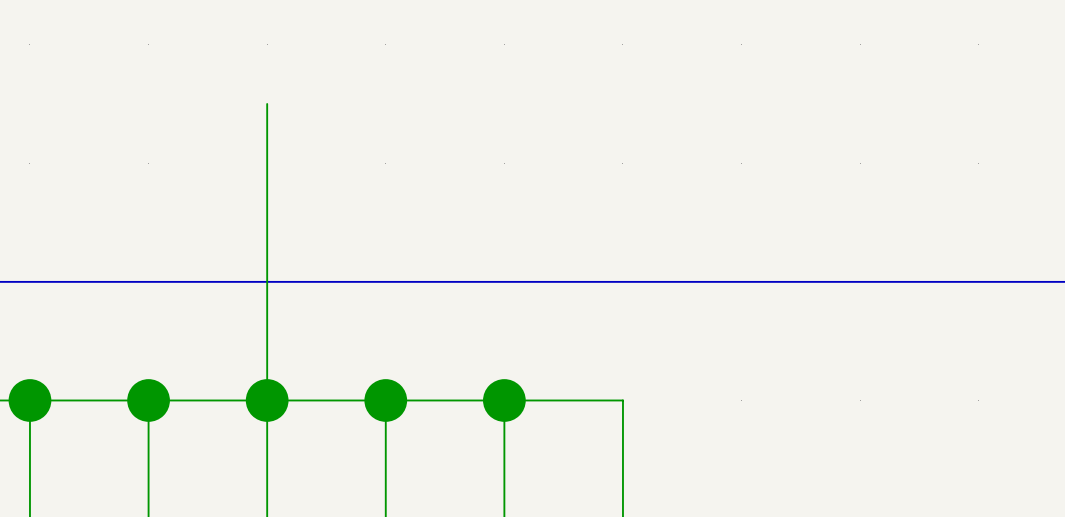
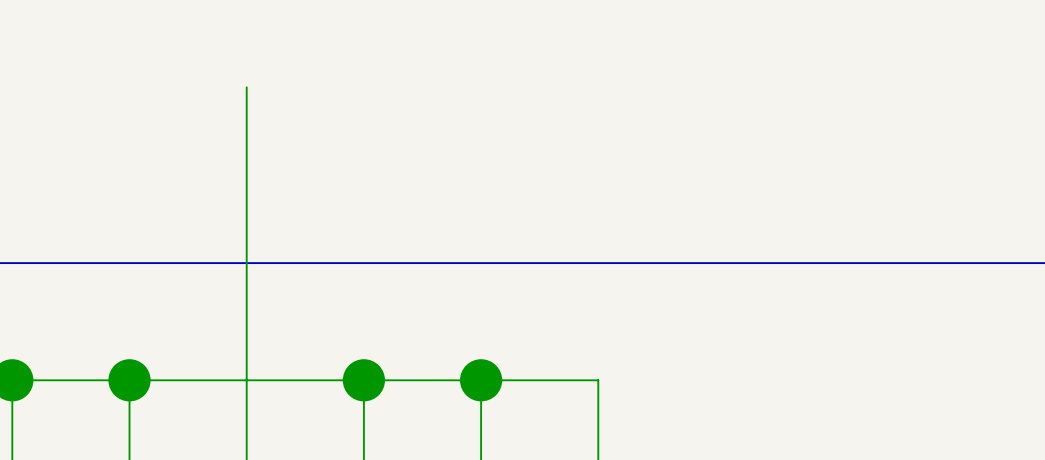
junction: (267, 400) -> none

